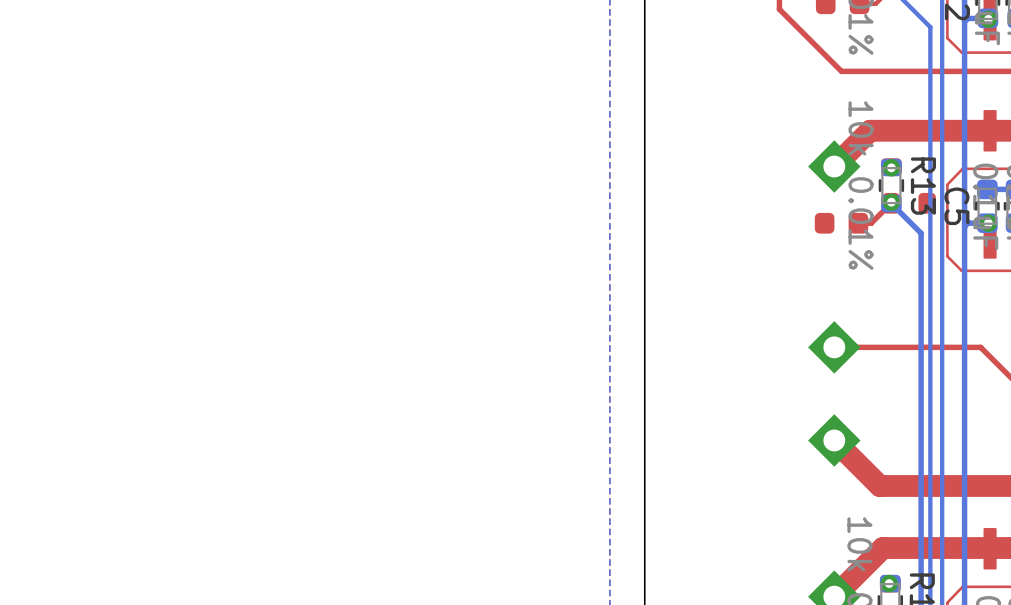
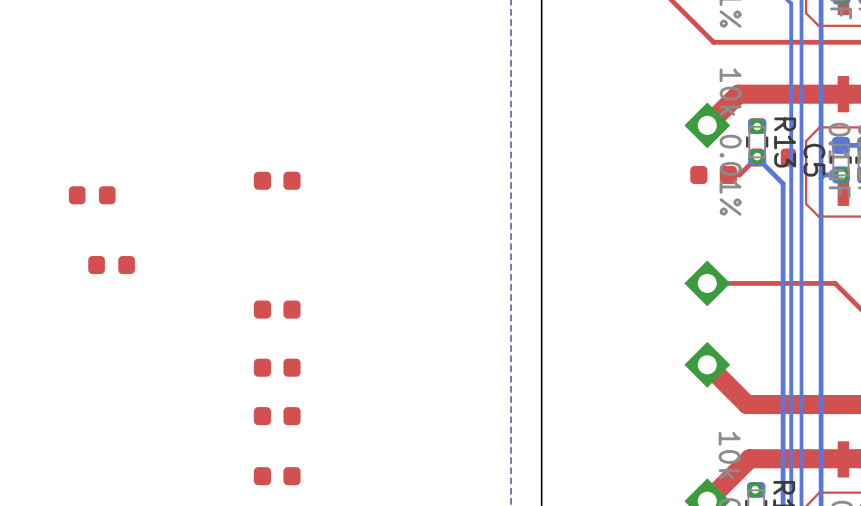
part: none -> (277, 180)
part: none -> (92, 195)
part: none -> (111, 265)
part: none -> (277, 309)
part: none -> (277, 367)
part: none -> (277, 416)
part: none -> (277, 476)

